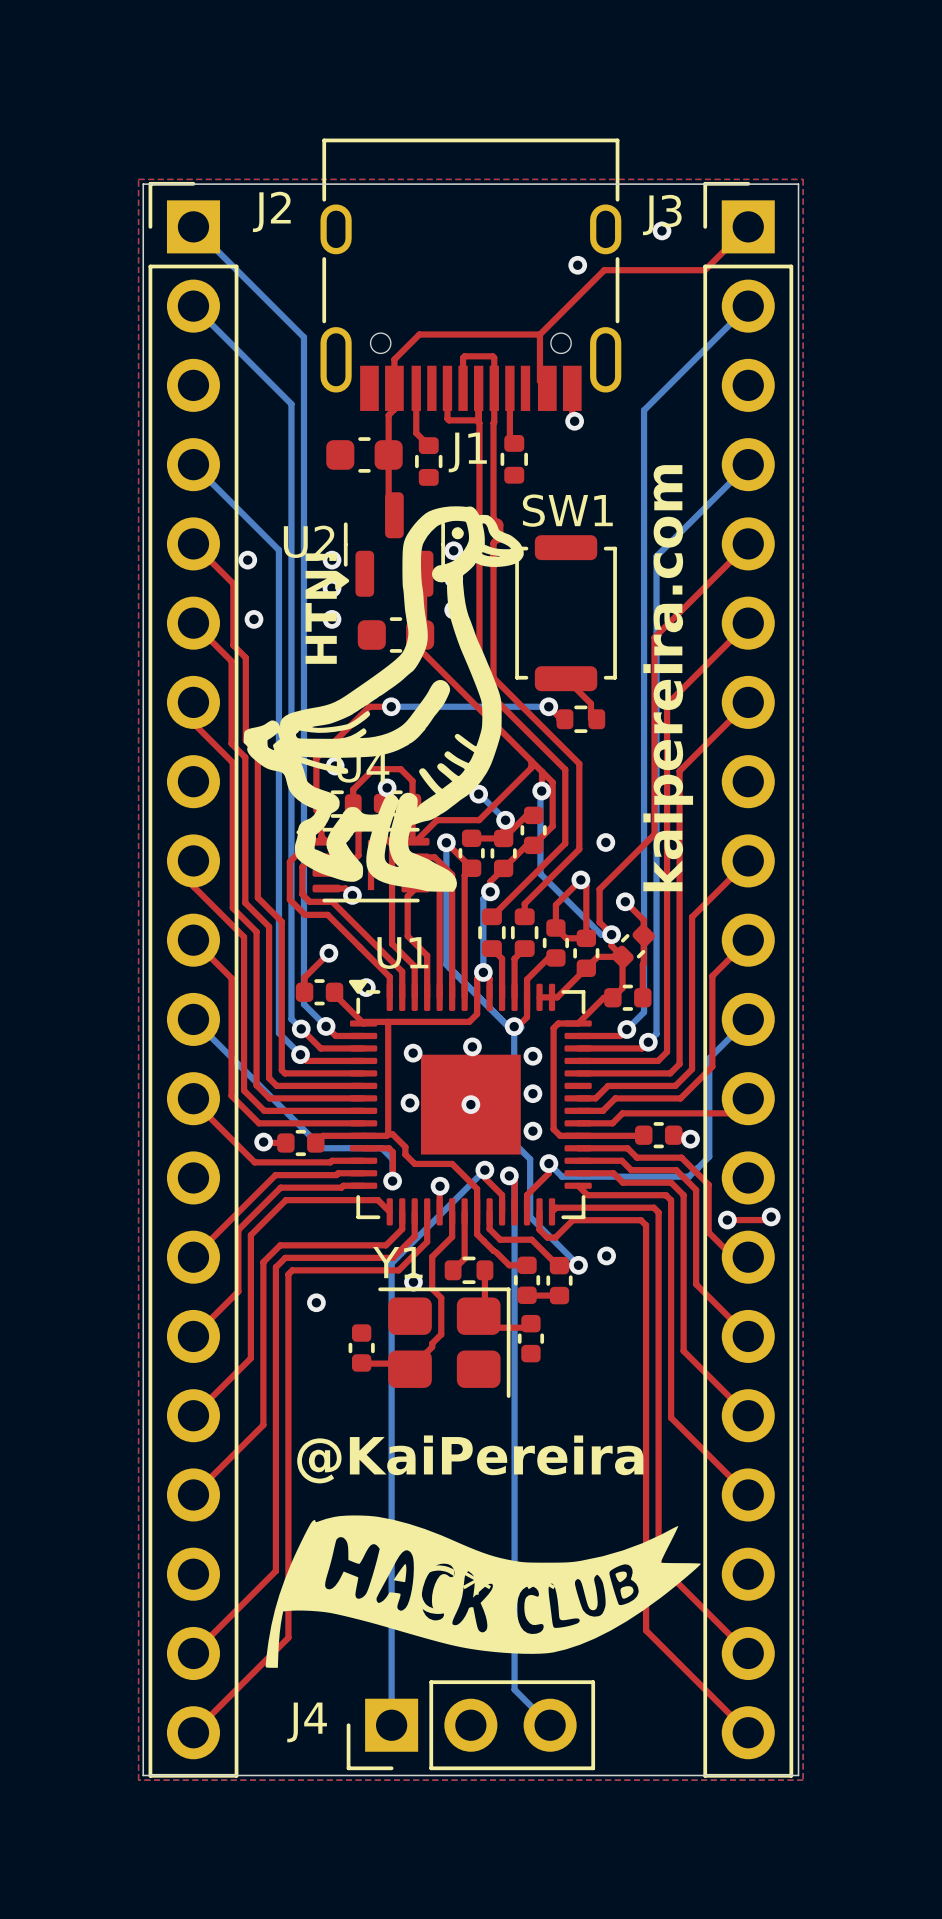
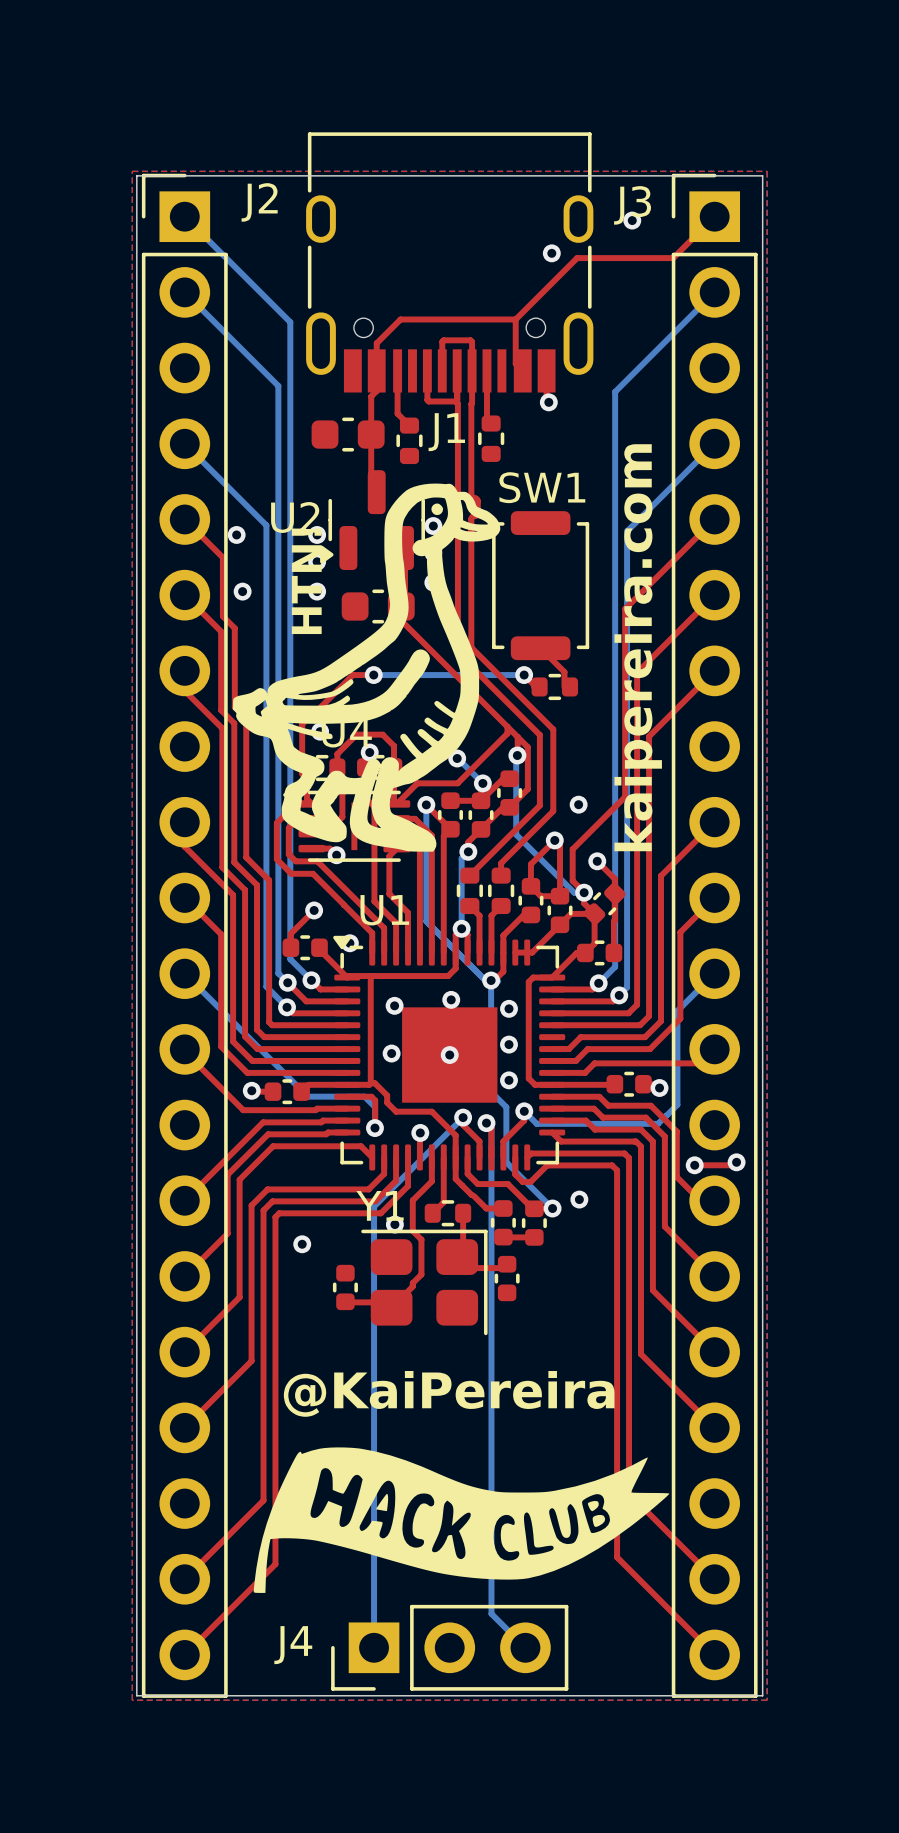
drawing: none -> [253, 1447, 670, 1593]
part: (483, 1591) -> none

